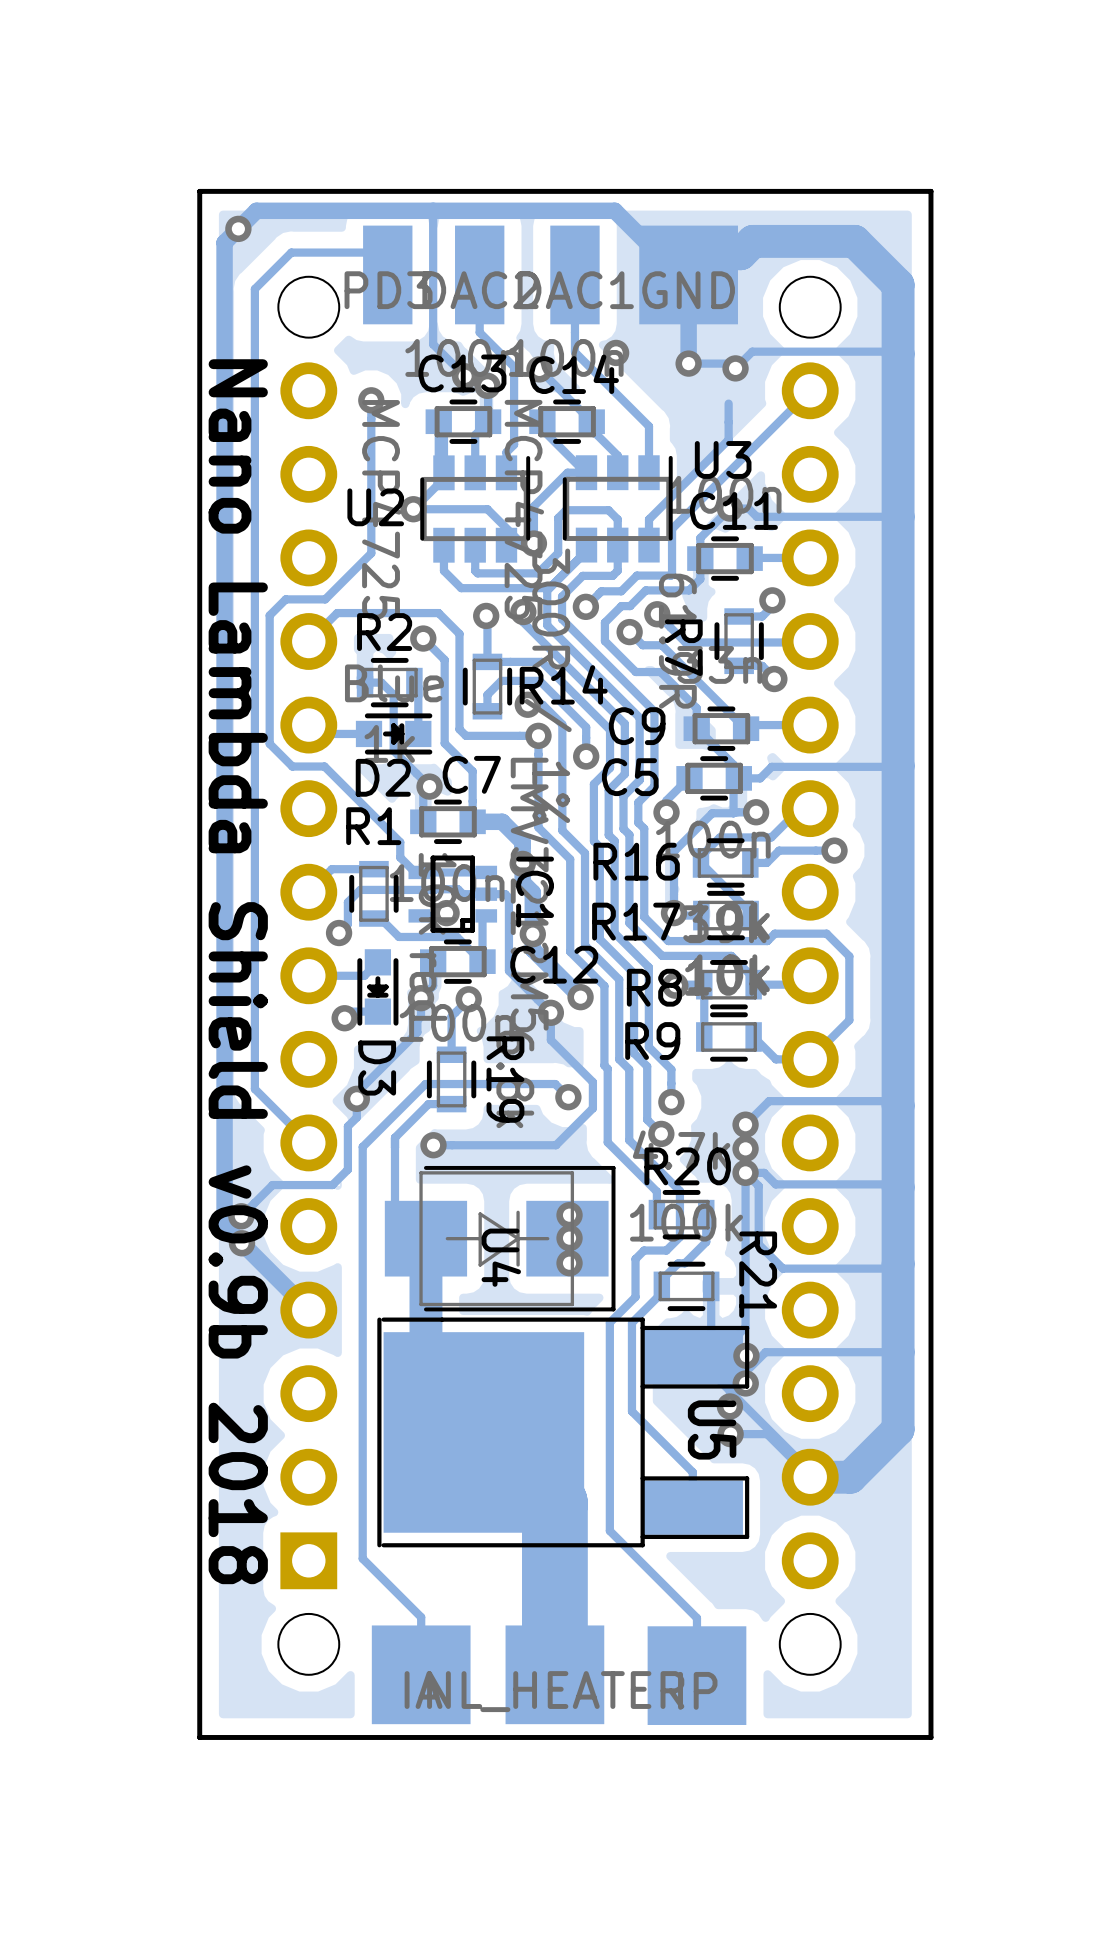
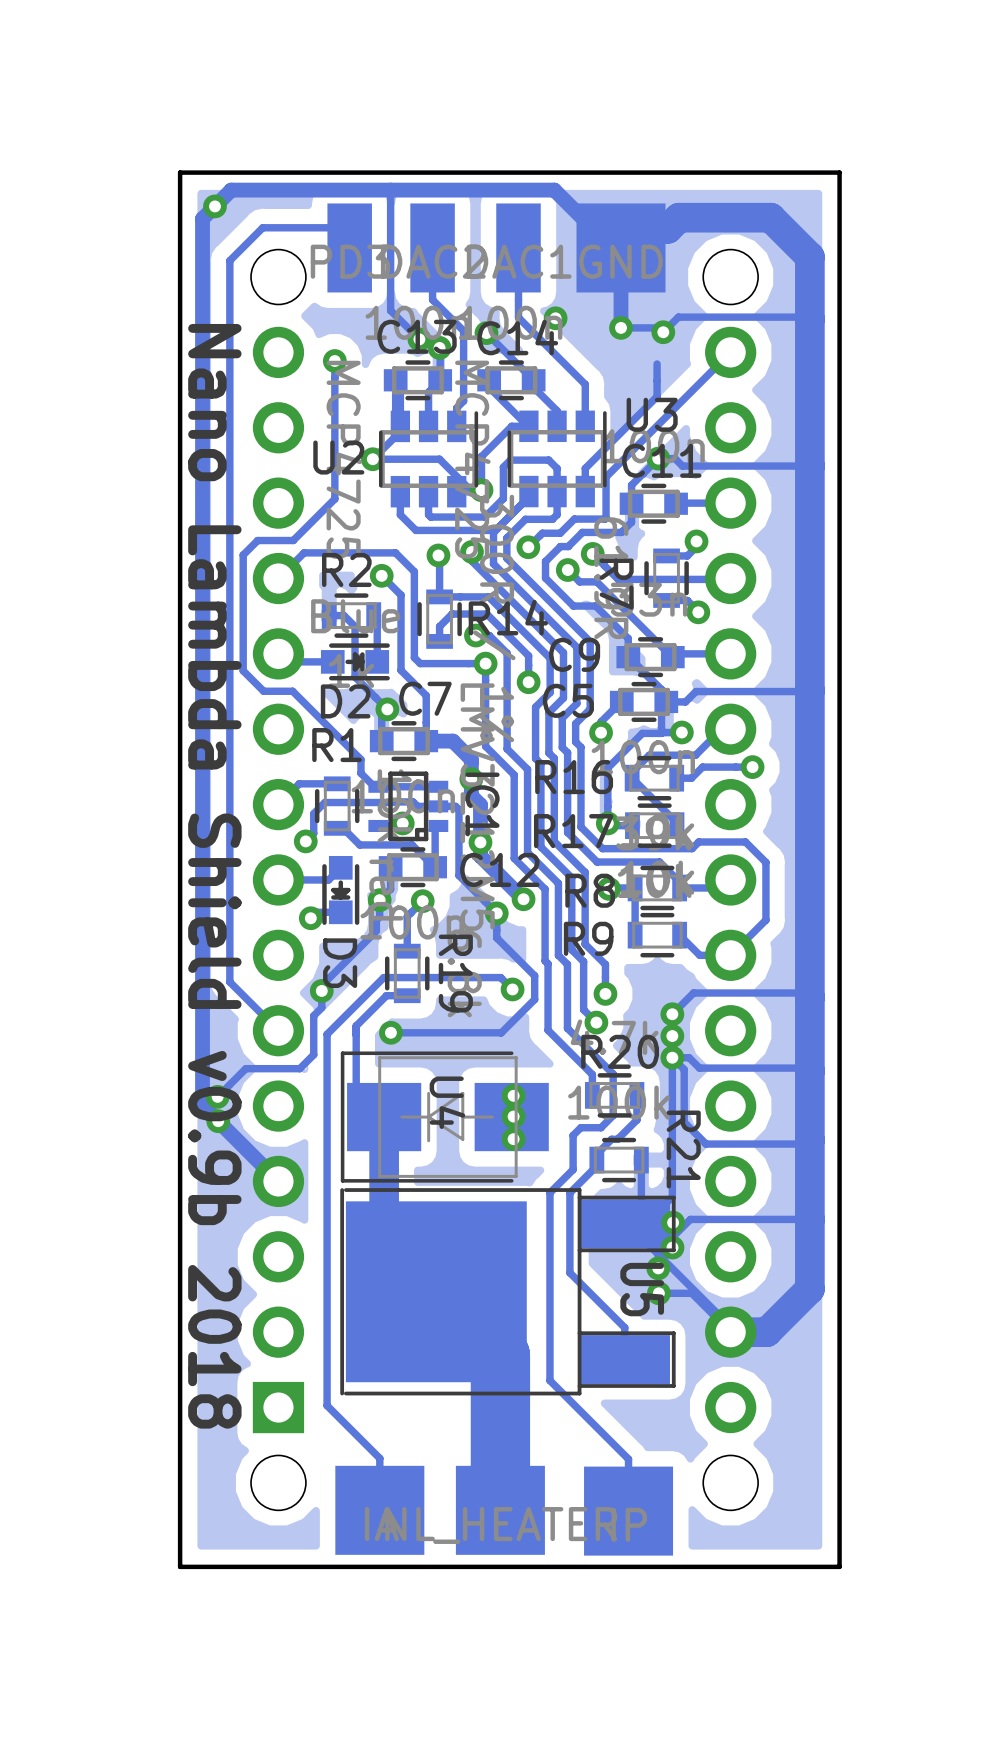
U4 rotation: 0° (500, 1238) -> 180° (444, 1117)

